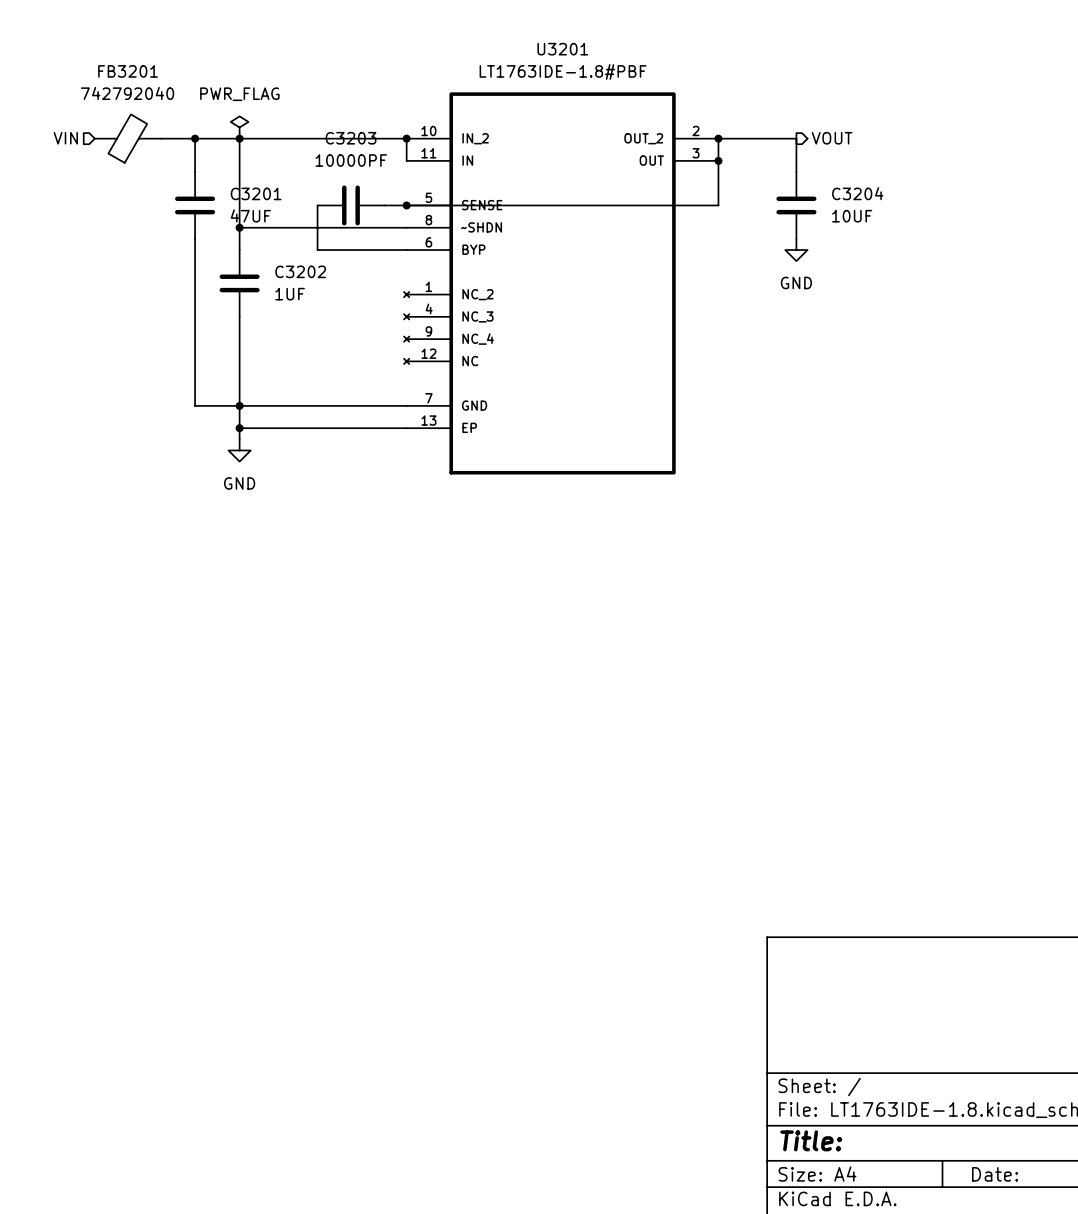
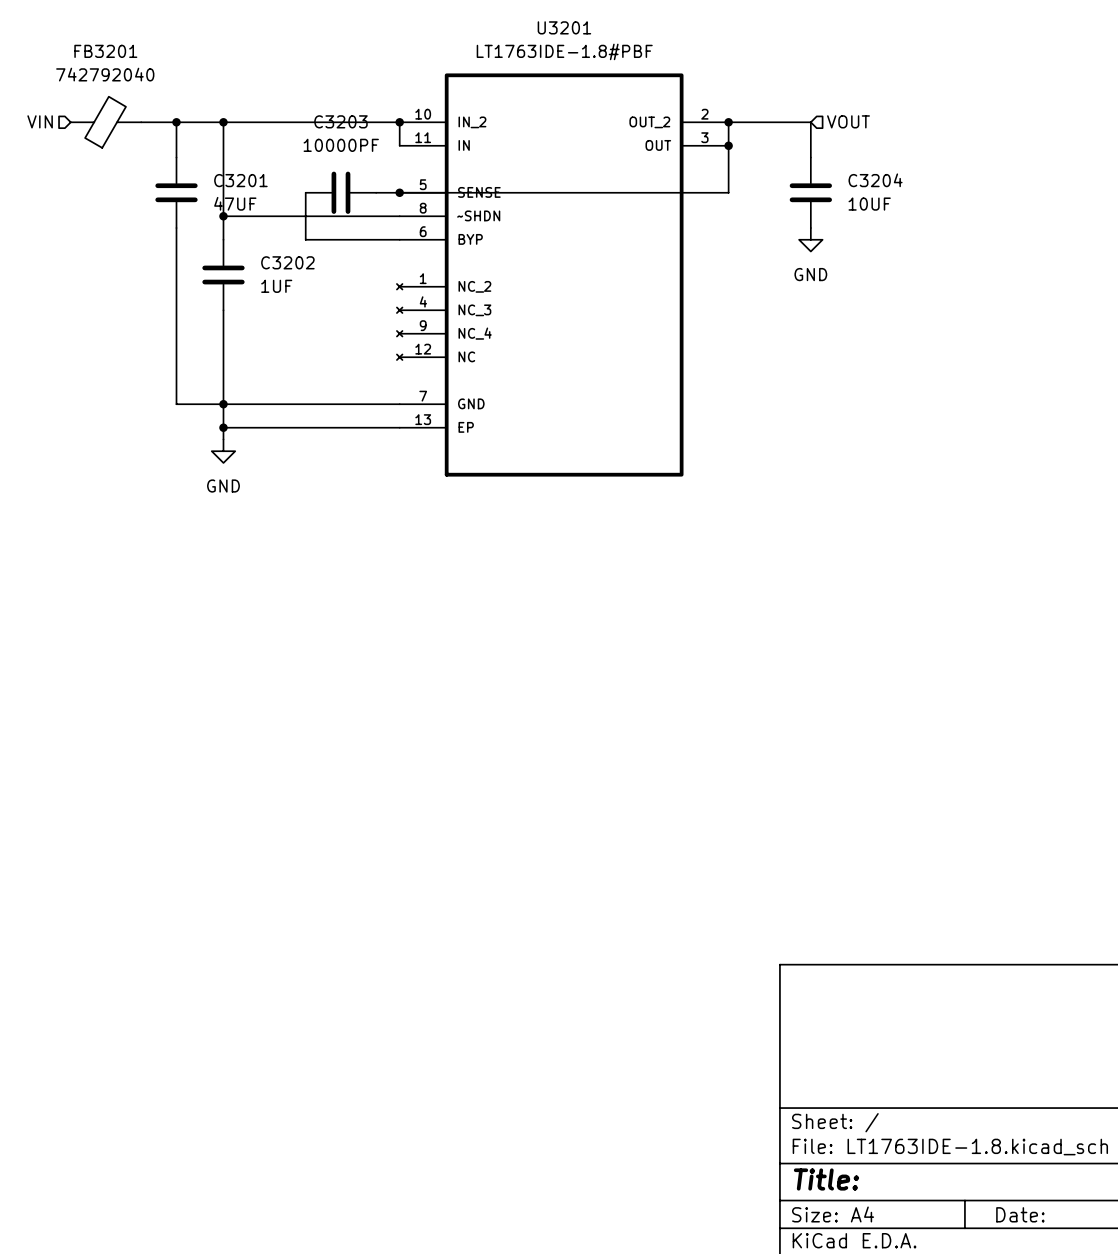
power symbol: PWR_FLAG (239, 127) -> none
hierarchical label shape: output (832, 138) -> input (848, 121)

